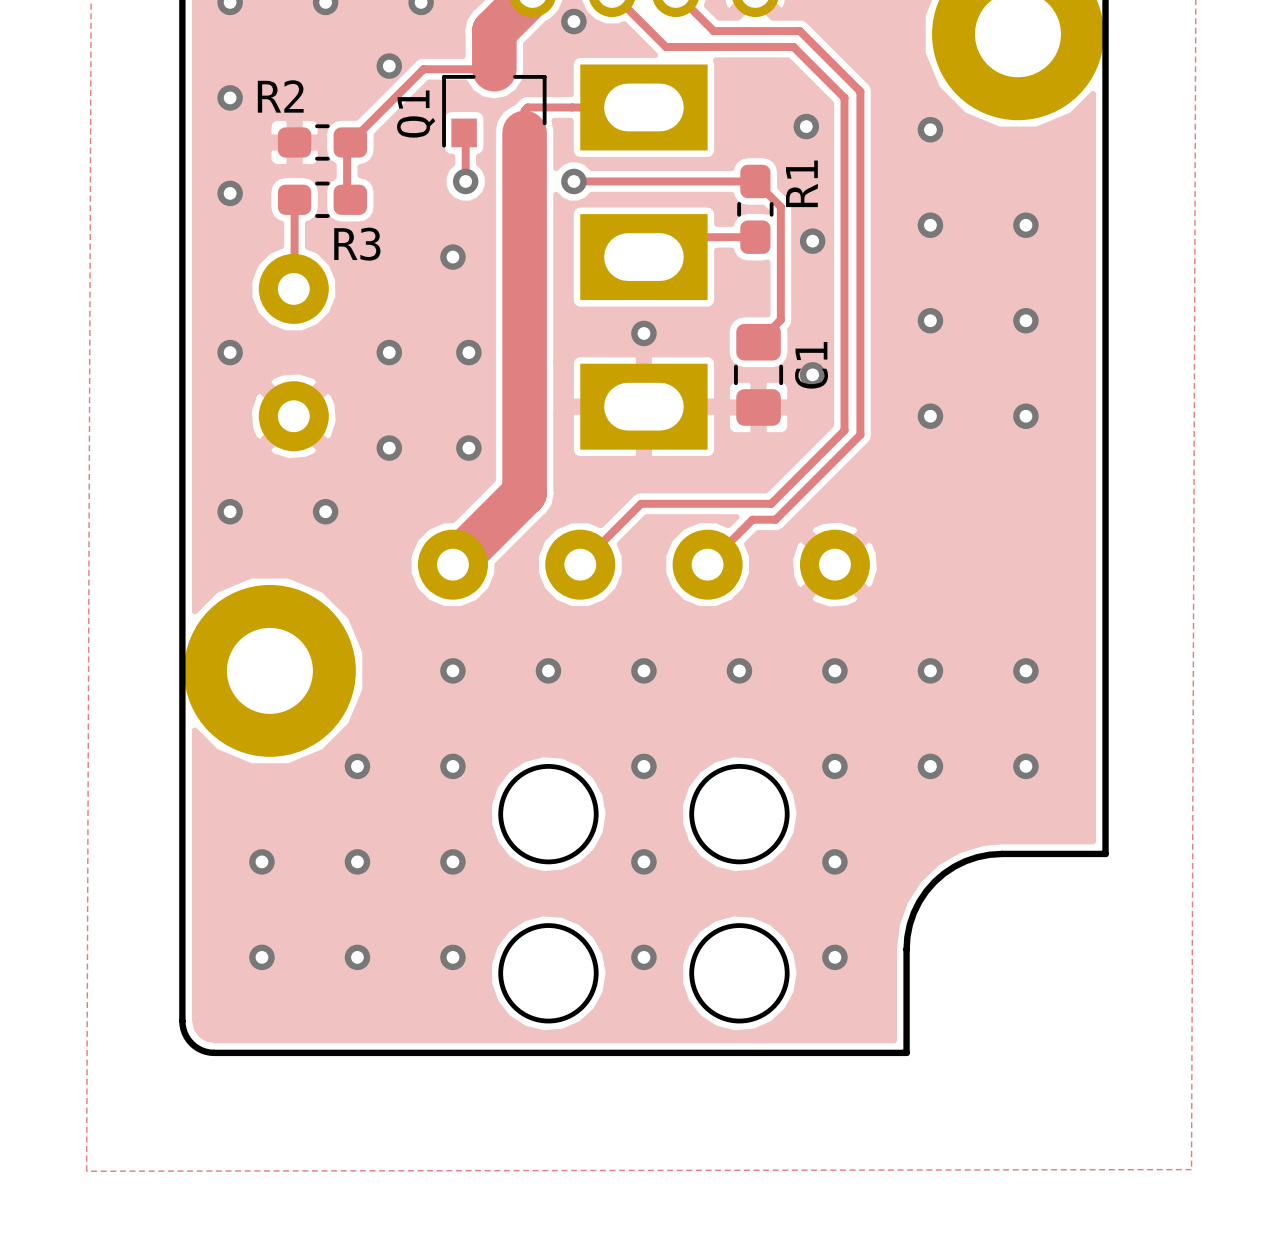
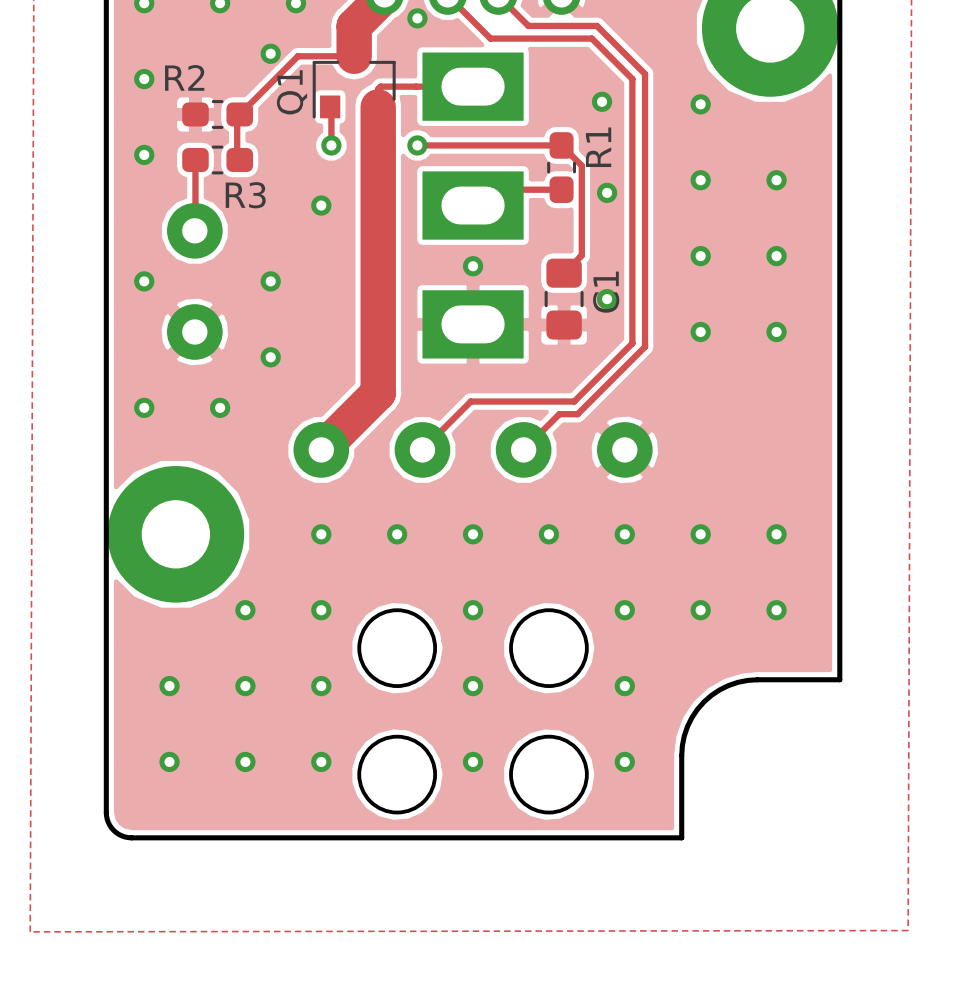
via: (468, 352) -> none
via: (468, 448) -> none

